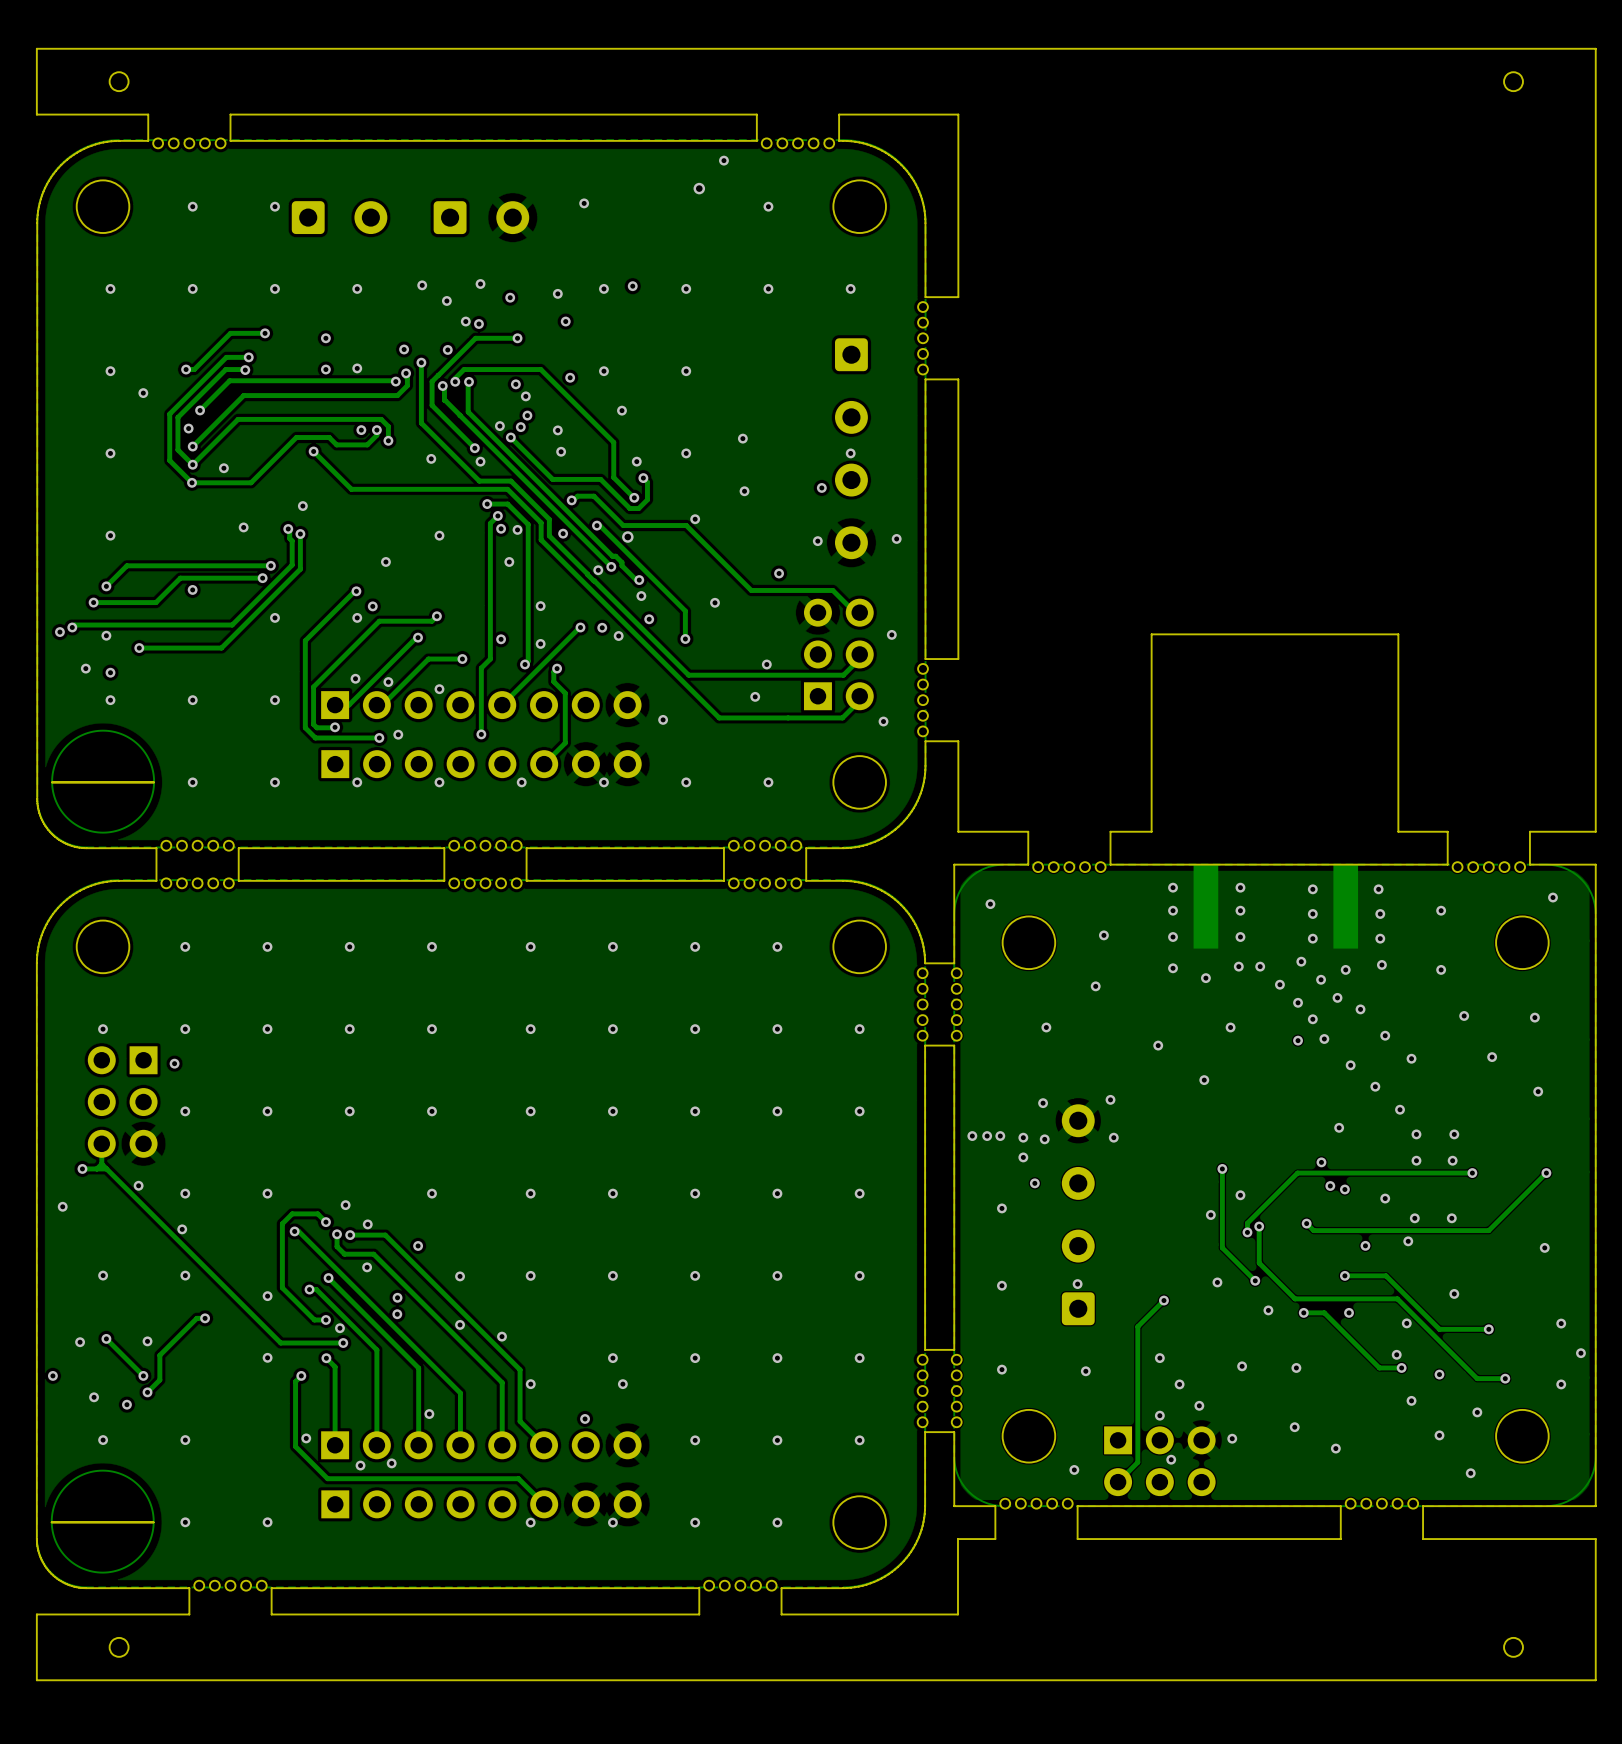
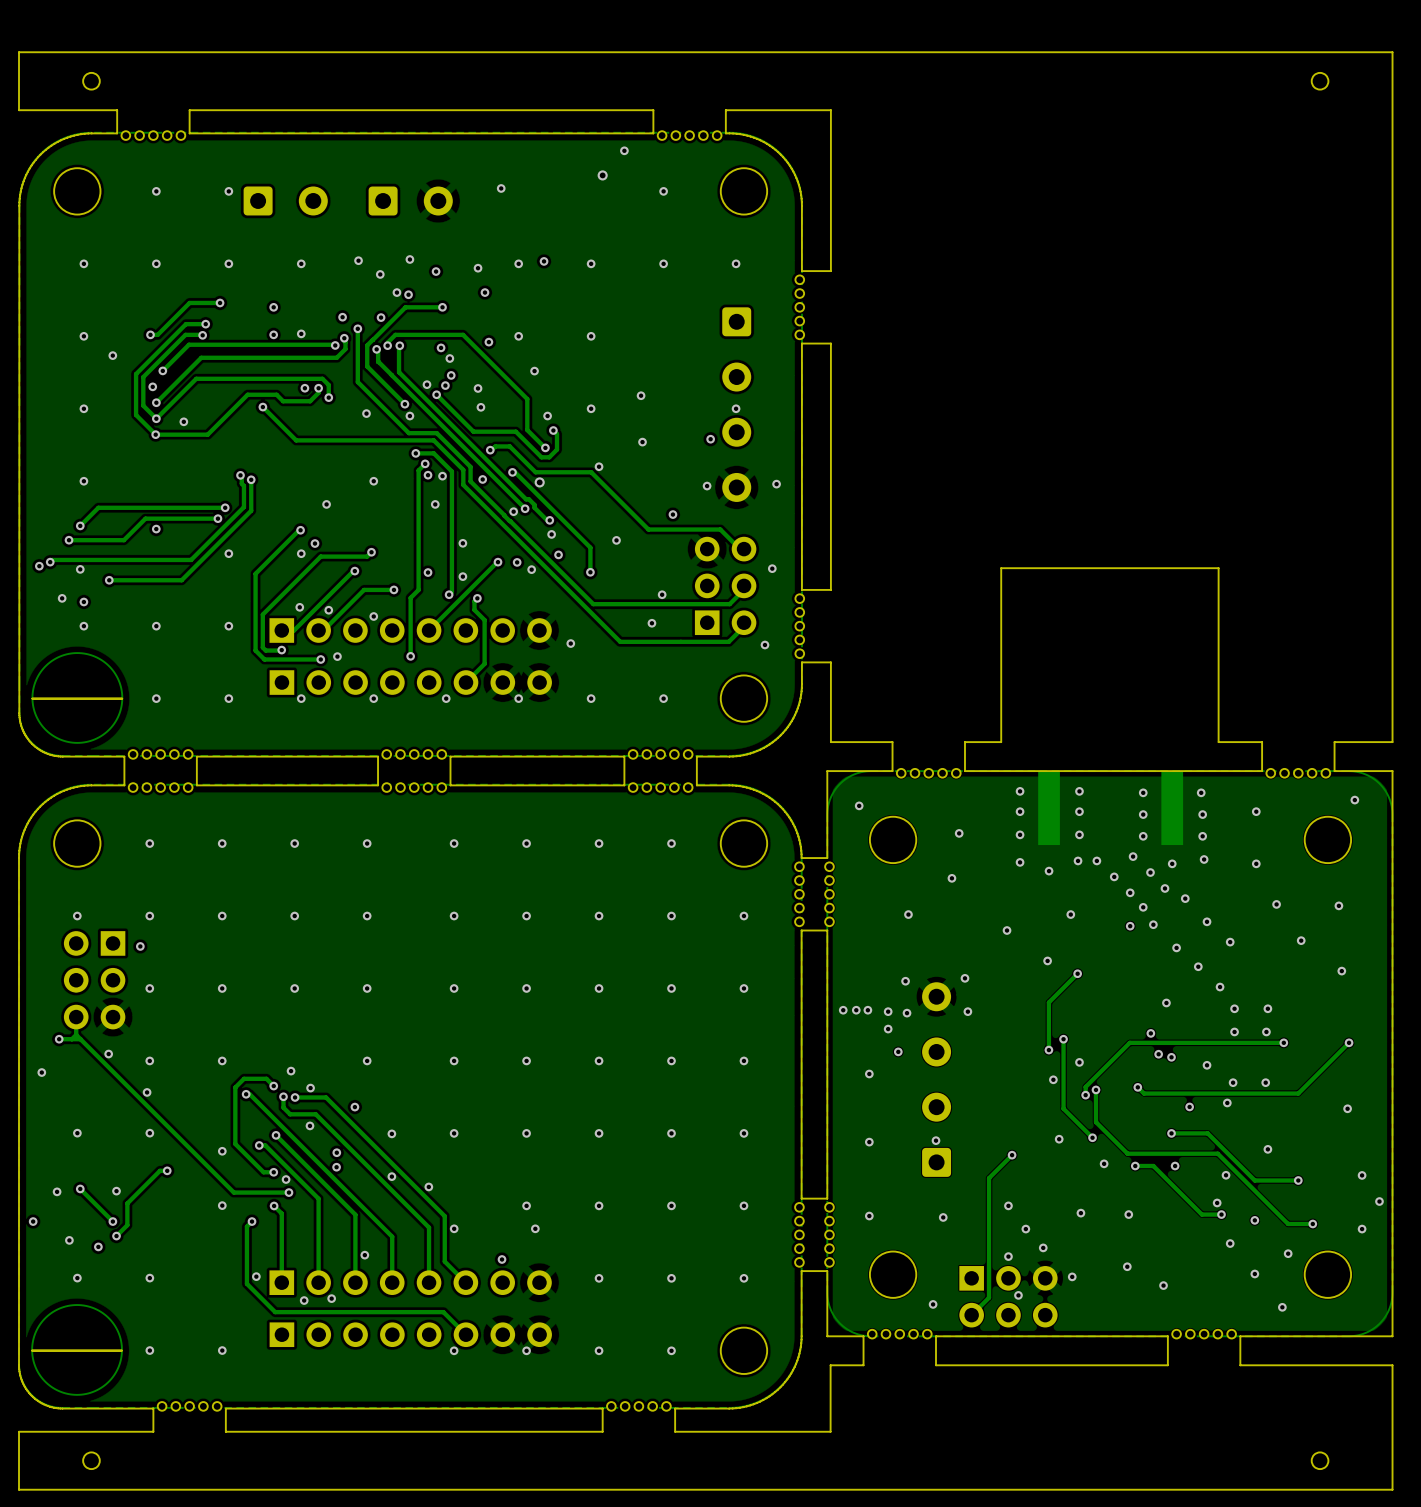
via: (302, 506) -> none
via: (243, 527) -> none
track: none -> (1077, 973) (1048, 1002) (1048, 1050)
via: none -> (1077, 973)
via: none -> (1048, 1050)

